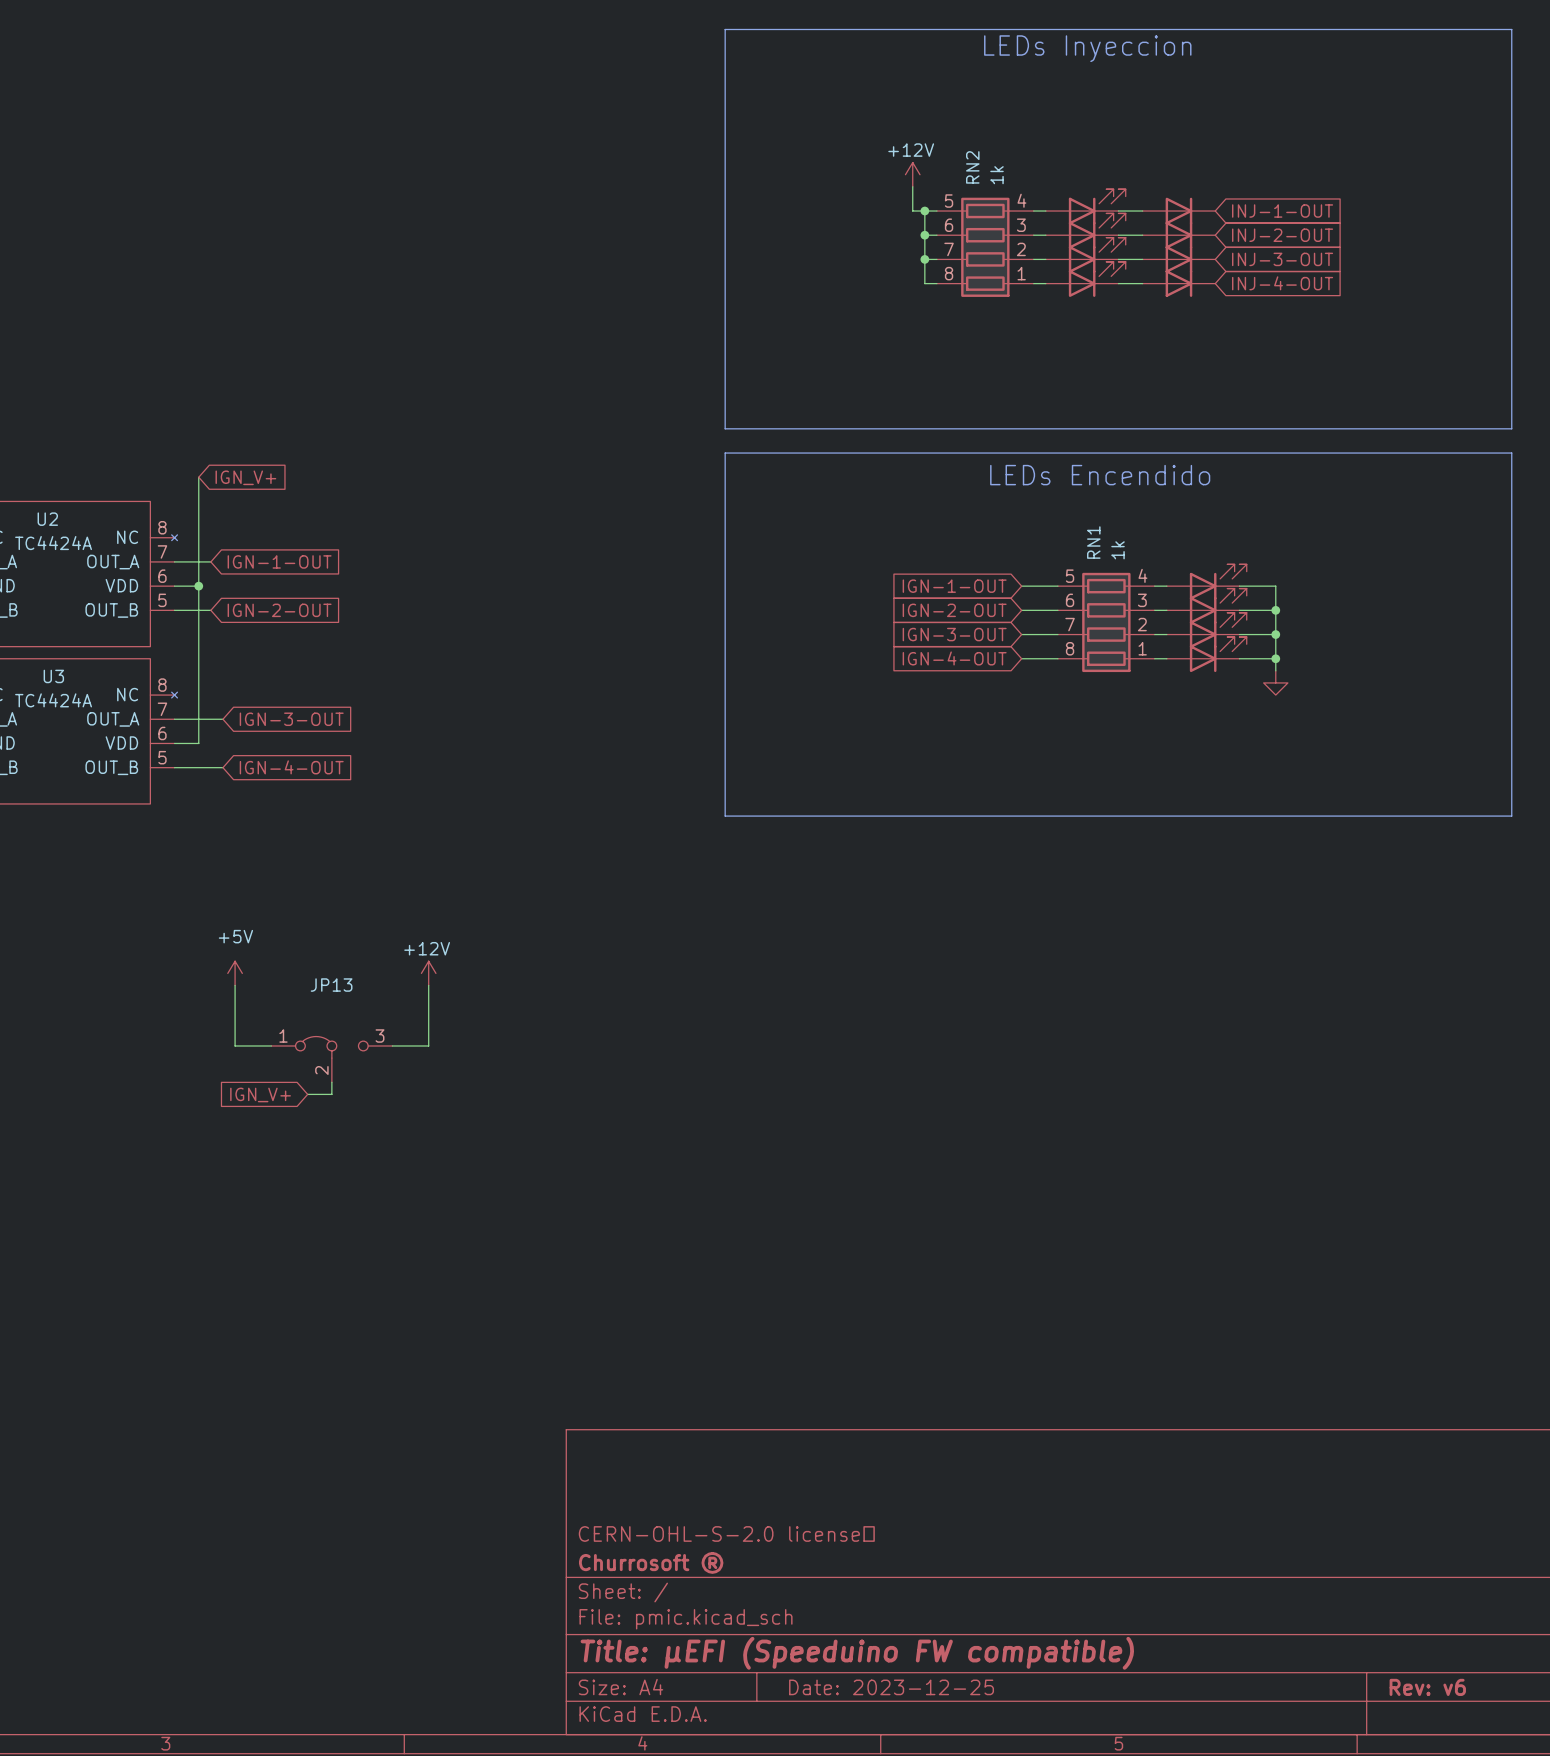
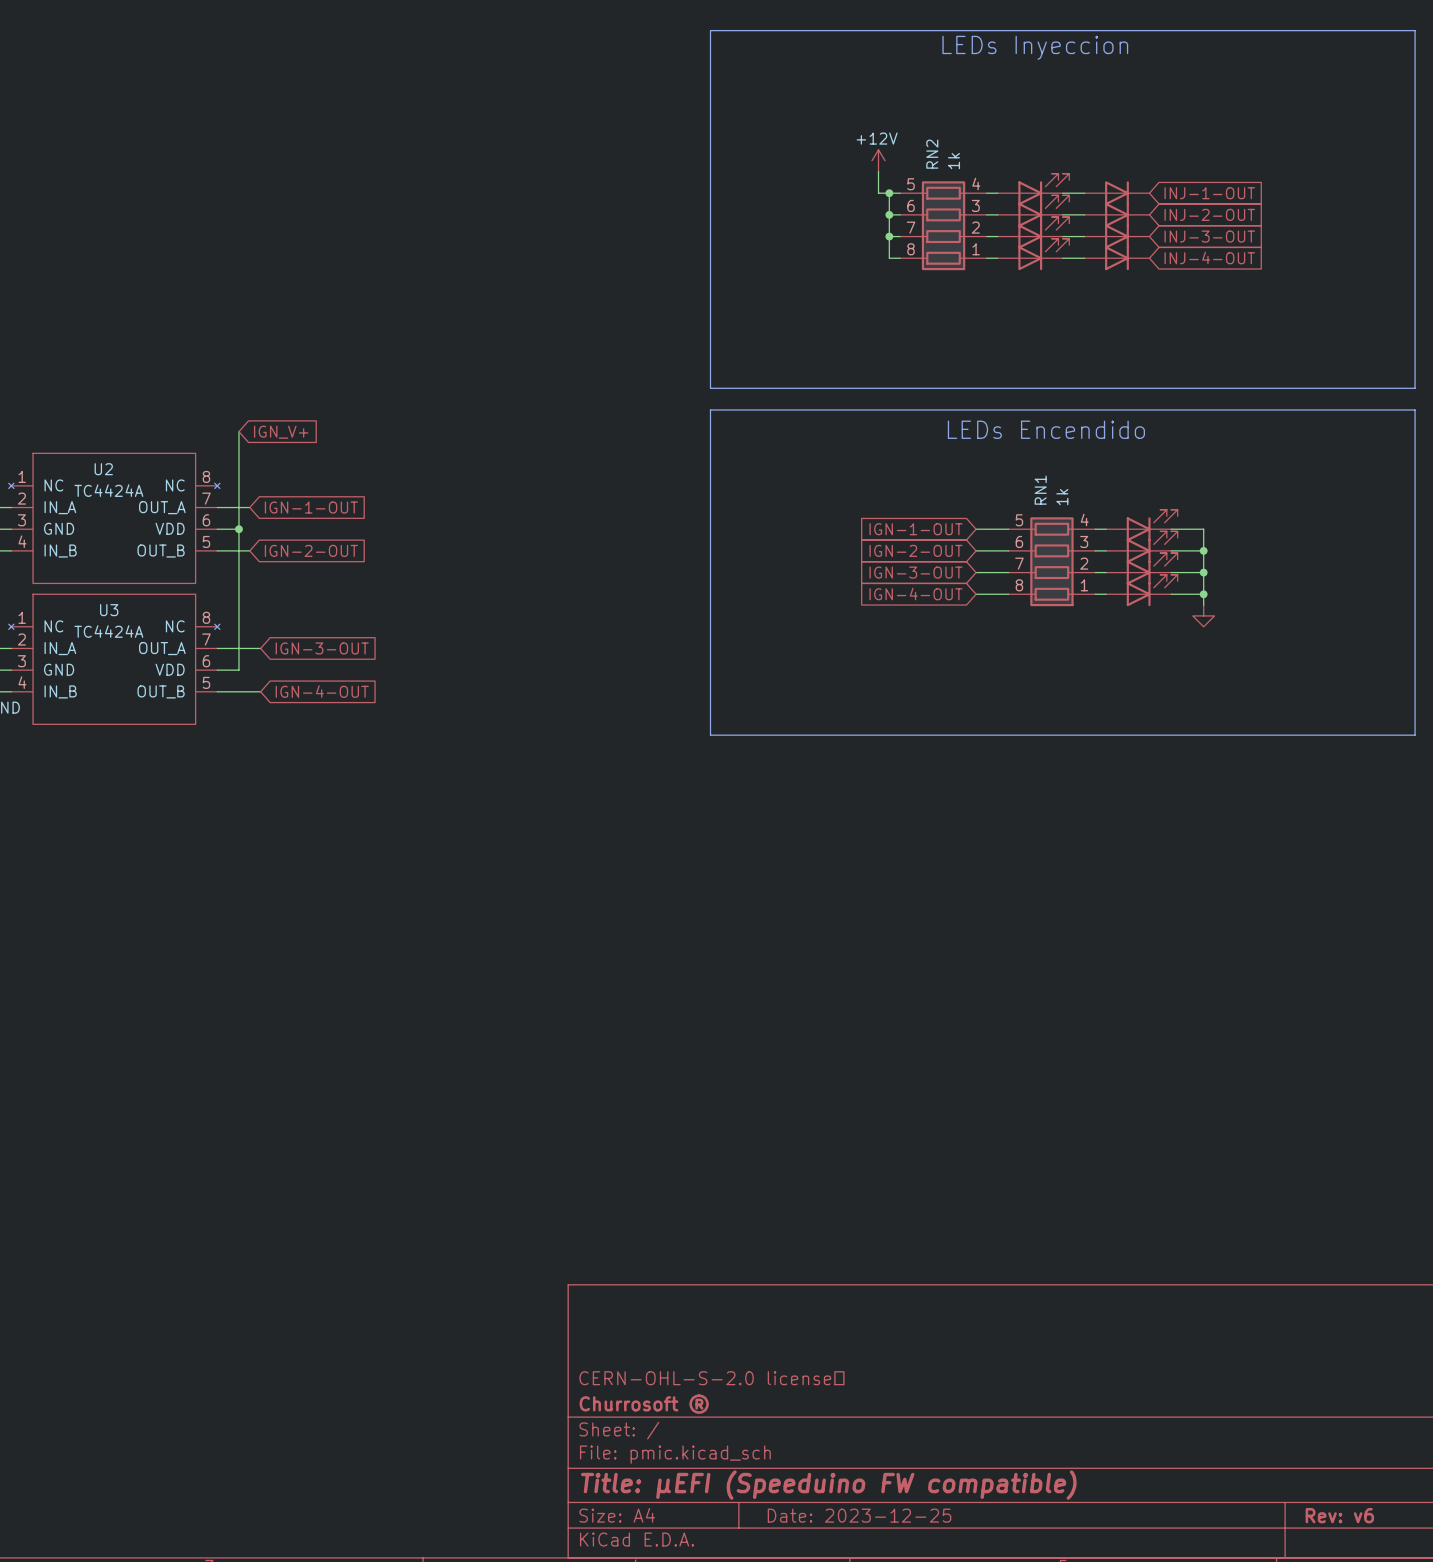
power symbol: +5V (235, 973) -> none
power symbol: +12V (428, 973) -> none
wire: (235, 985) (235, 1045) (271, 1045) -> none
wire: (428, 985) (428, 1045) (392, 1045) -> none
JP13: (331, 1059) -> none
wire: (331, 1082) (331, 1094) (307, 1094) -> none
global label: IGN_V+ (260, 1094) -> none

